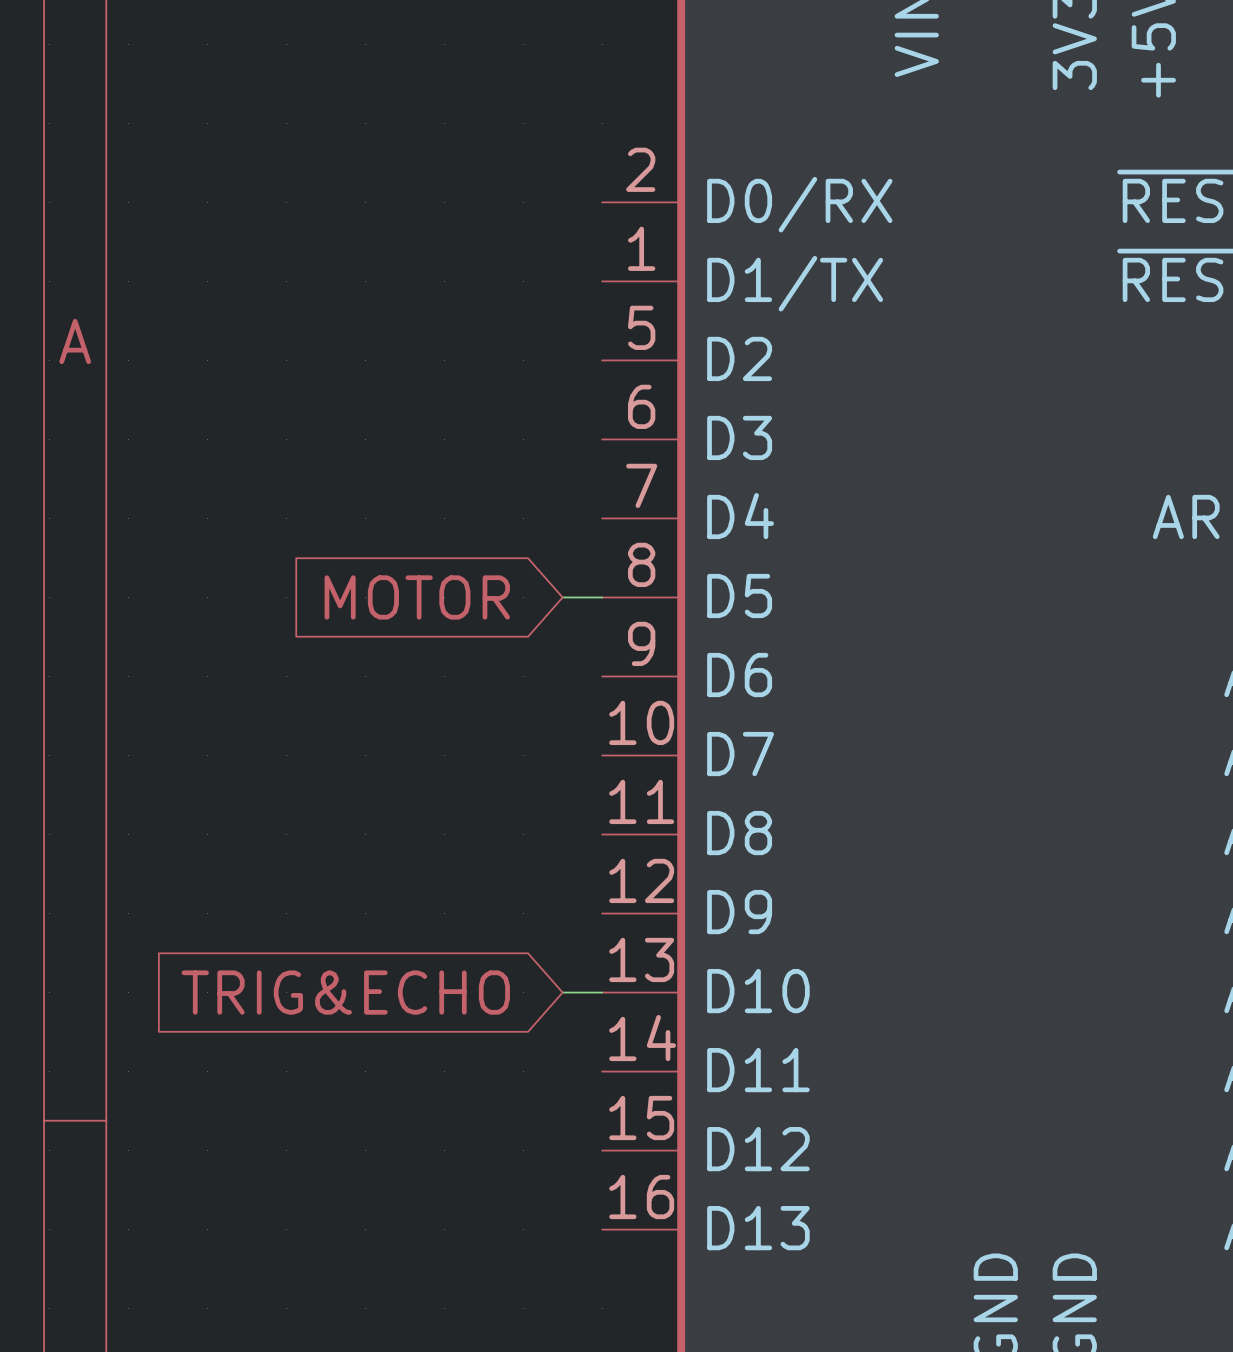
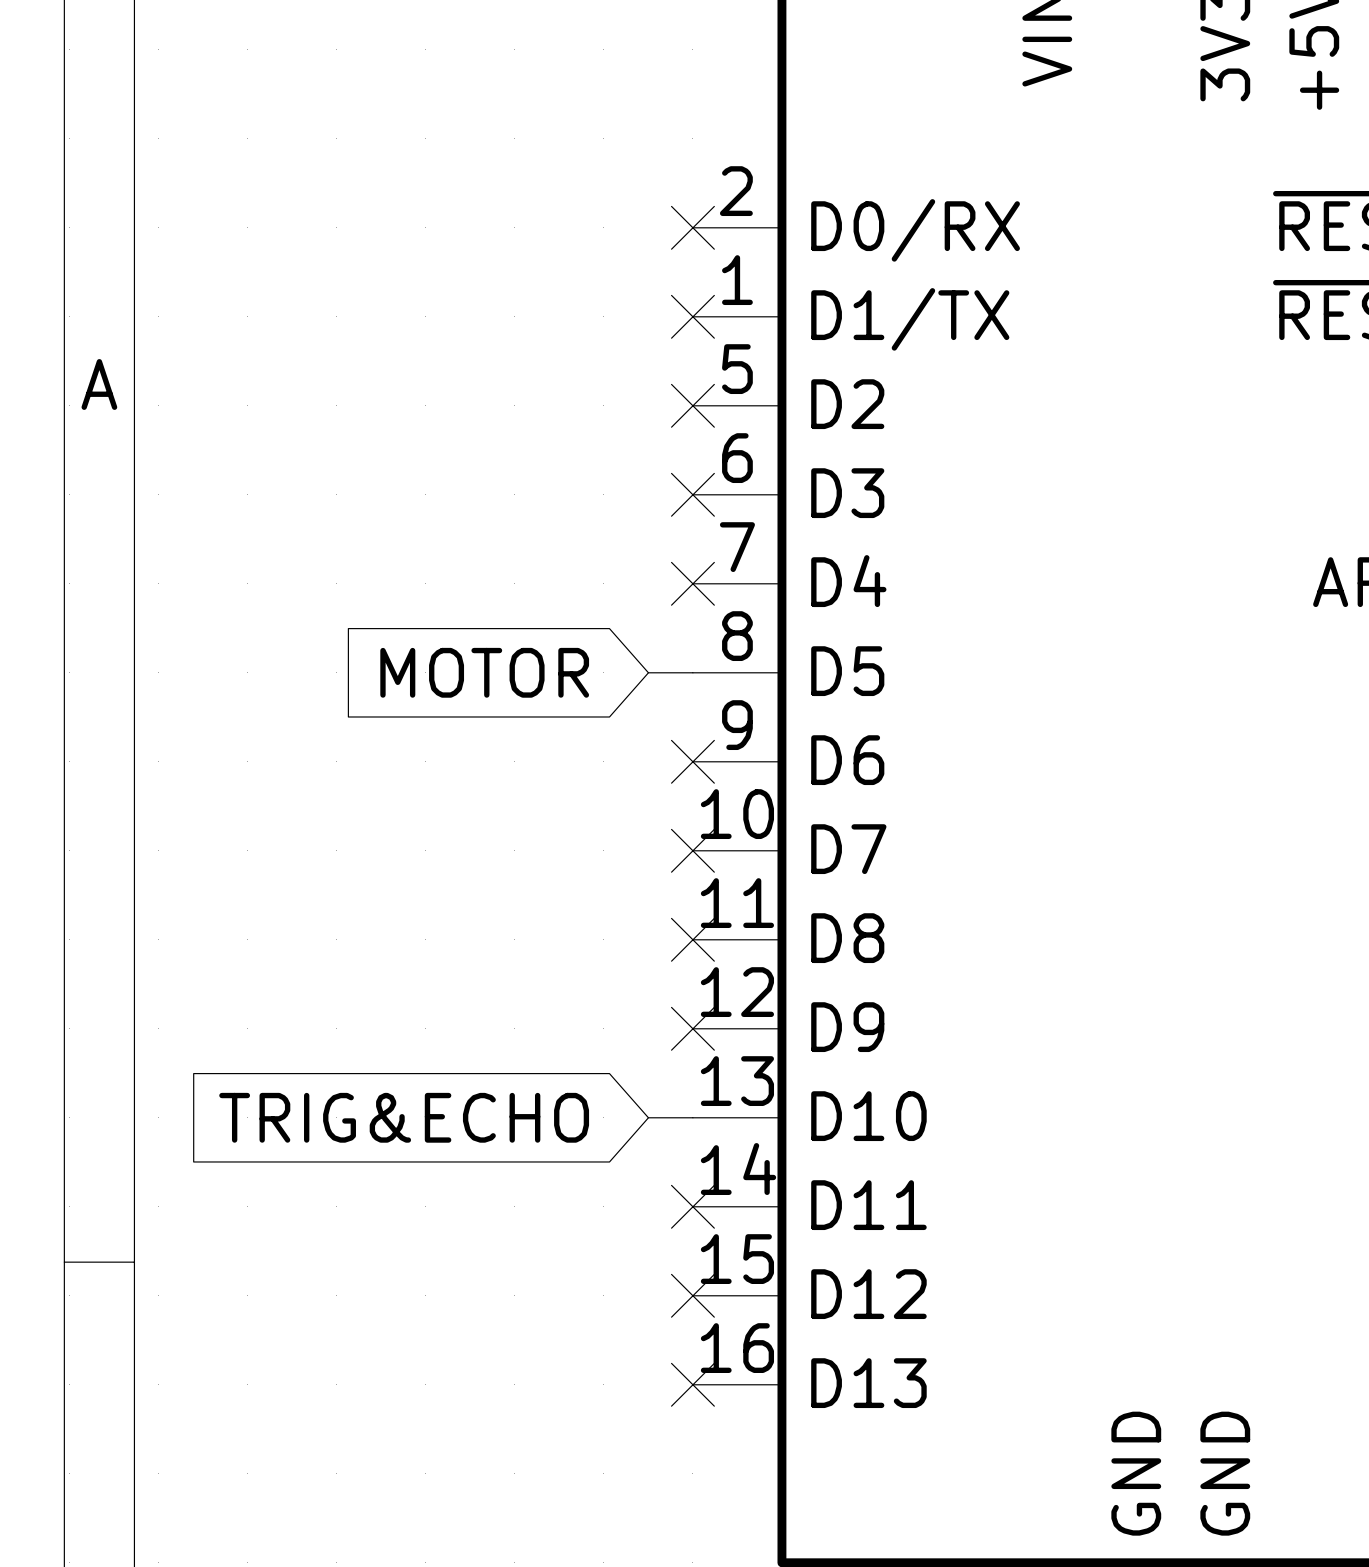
no-connect mark: none -> (692, 227)
no-connect mark: none -> (692, 316)
no-connect mark: none -> (692, 405)
no-connect mark: none -> (692, 494)
no-connect mark: none -> (692, 583)
no-connect mark: none -> (692, 761)
no-connect mark: none -> (692, 850)
no-connect mark: none -> (692, 939)
no-connect mark: none -> (692, 1028)
no-connect mark: none -> (692, 1206)
no-connect mark: none -> (692, 1295)
no-connect mark: none -> (692, 1384)

